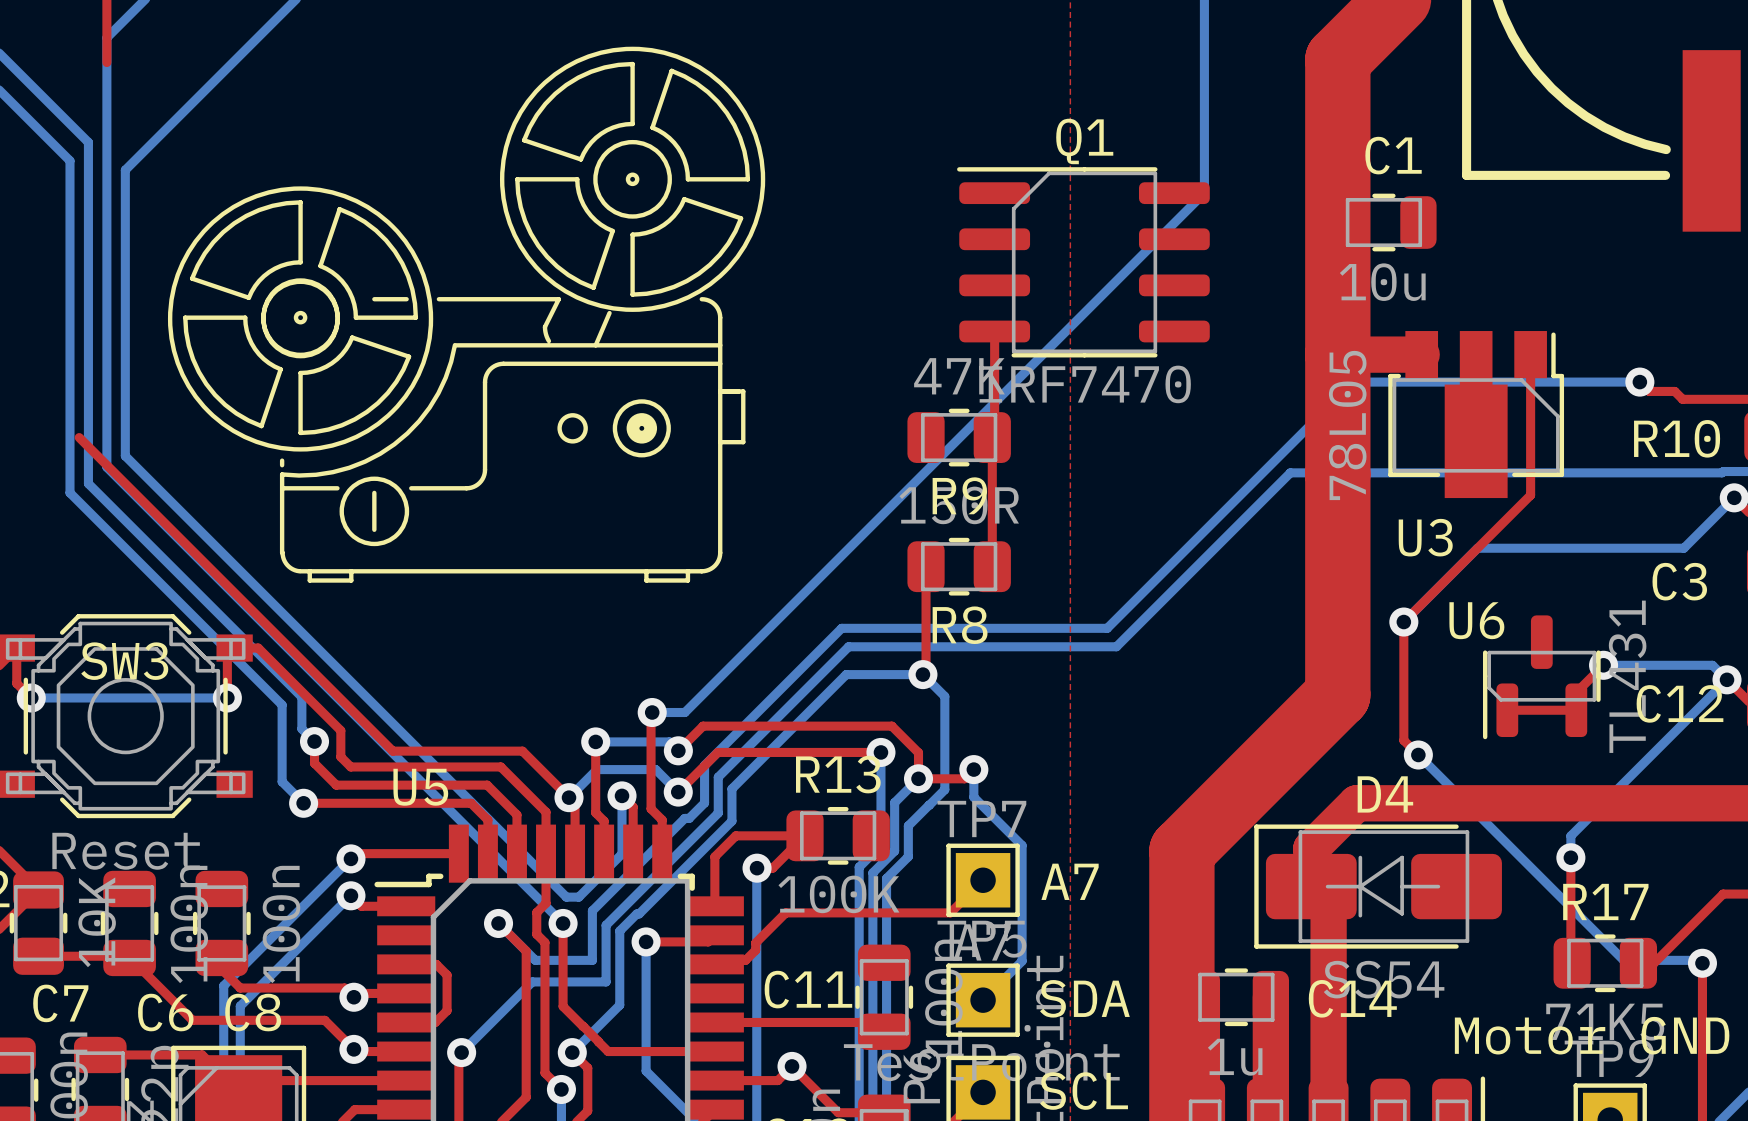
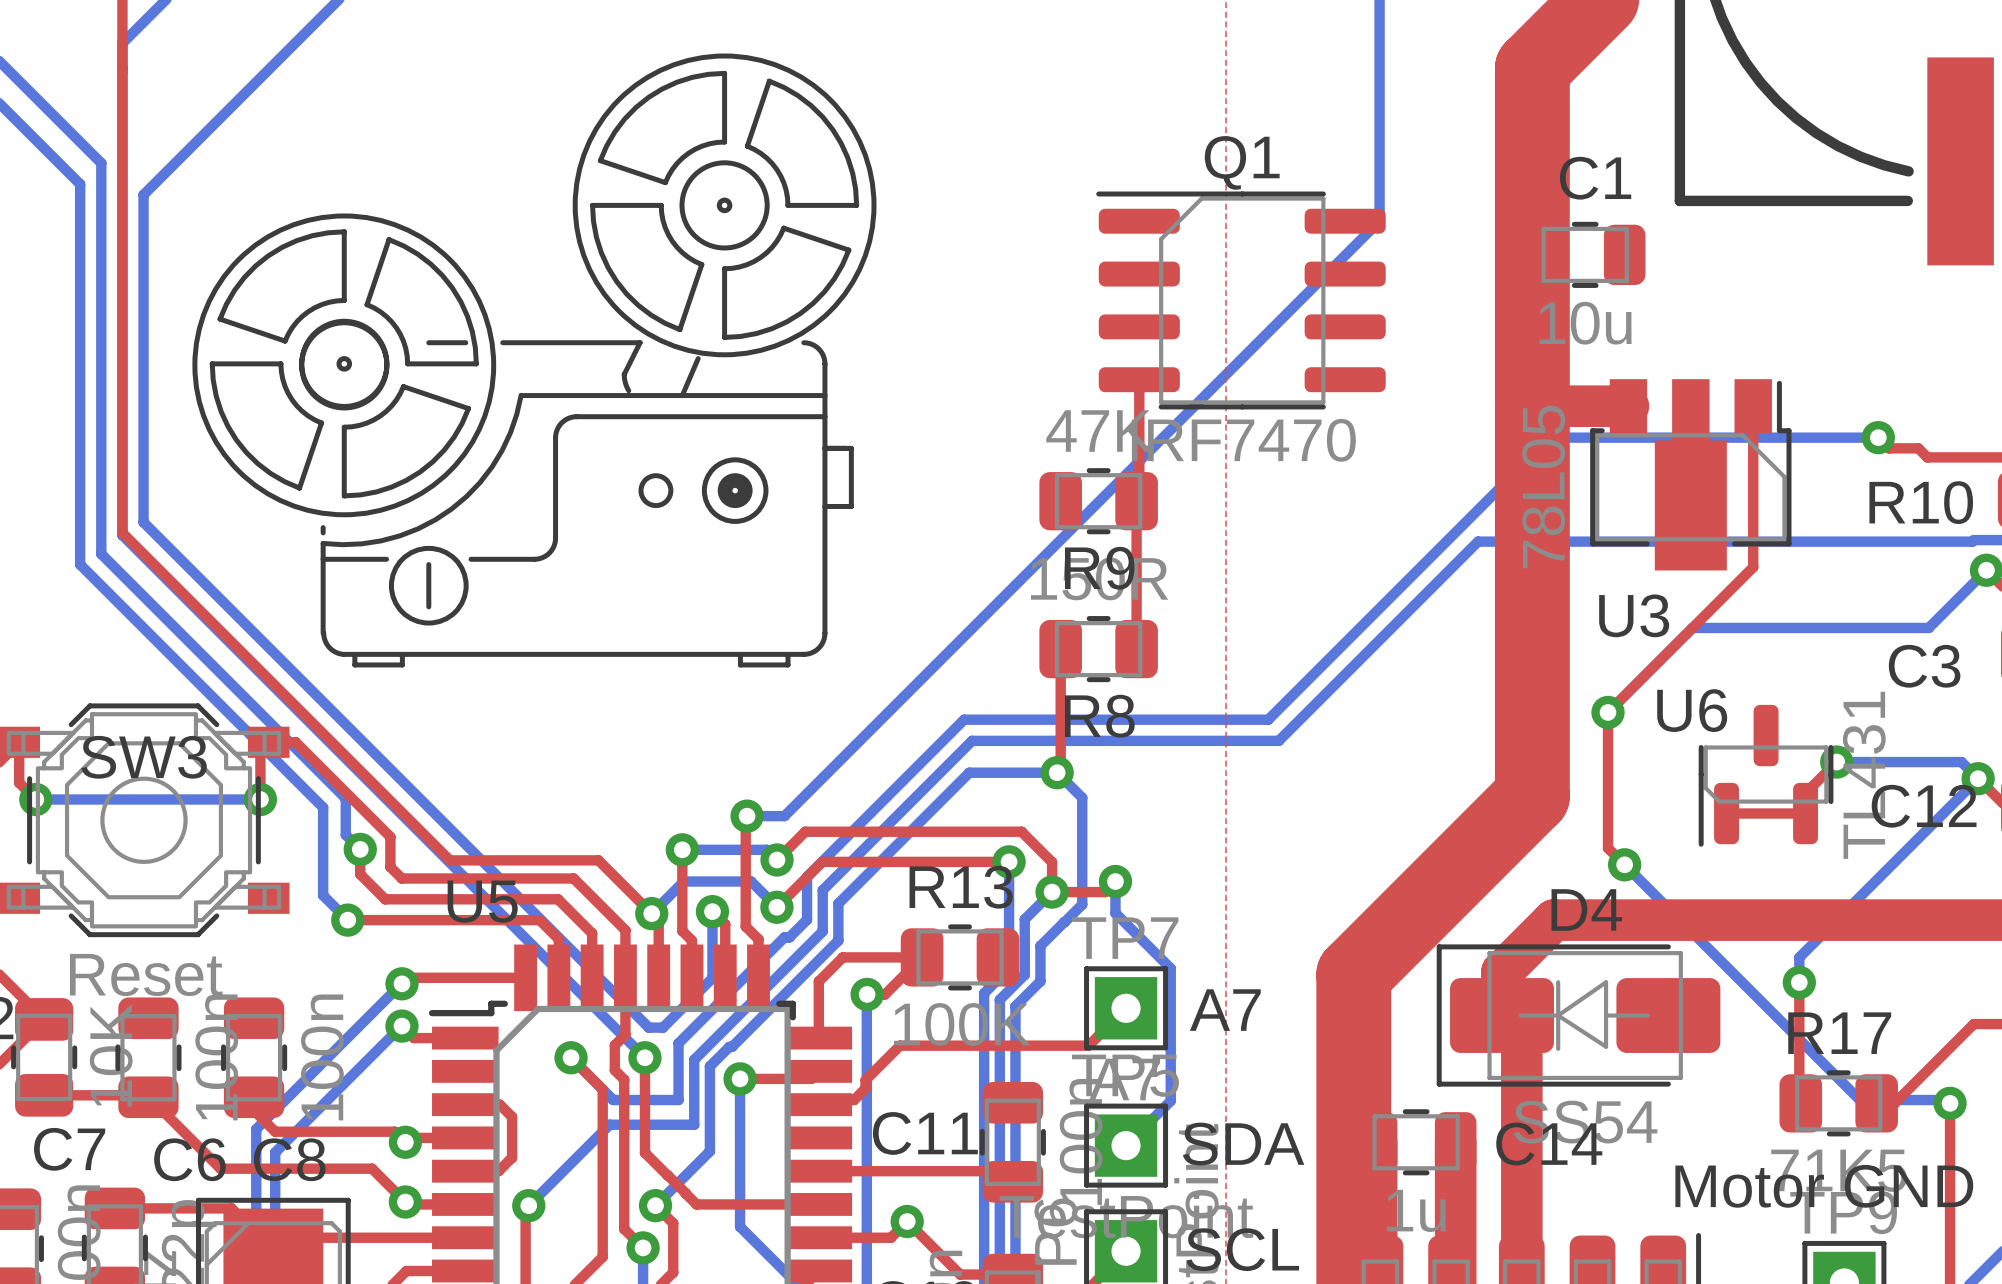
top track: (79, 437) (106, 465) -> (122, 71) (122, 532)

